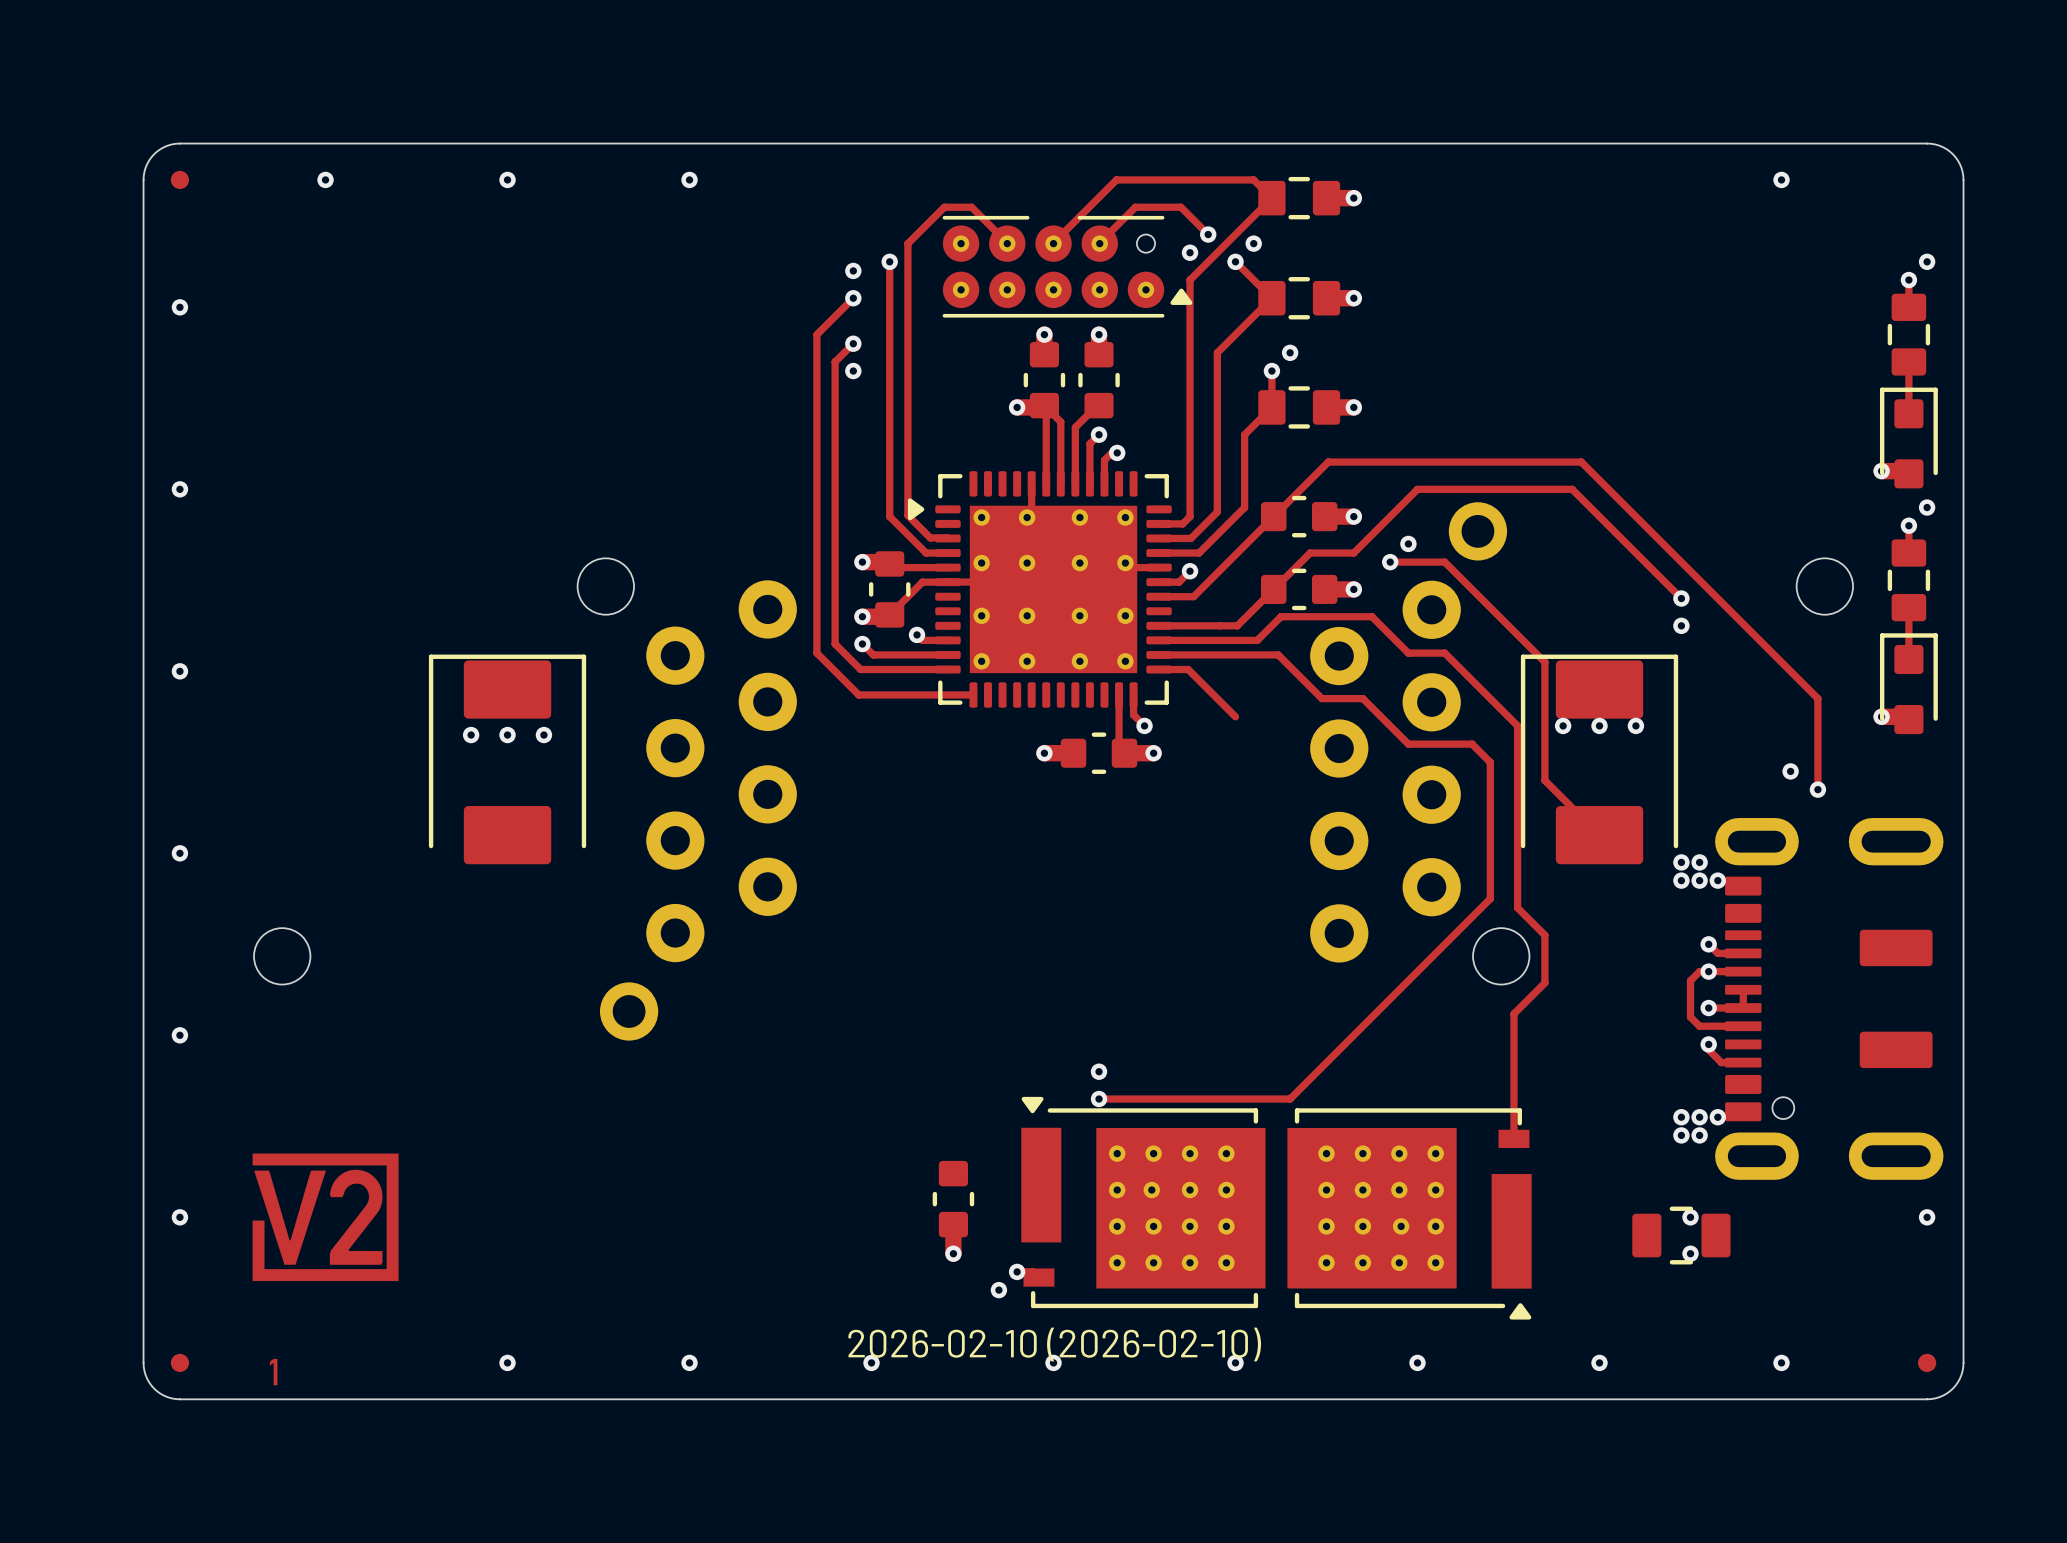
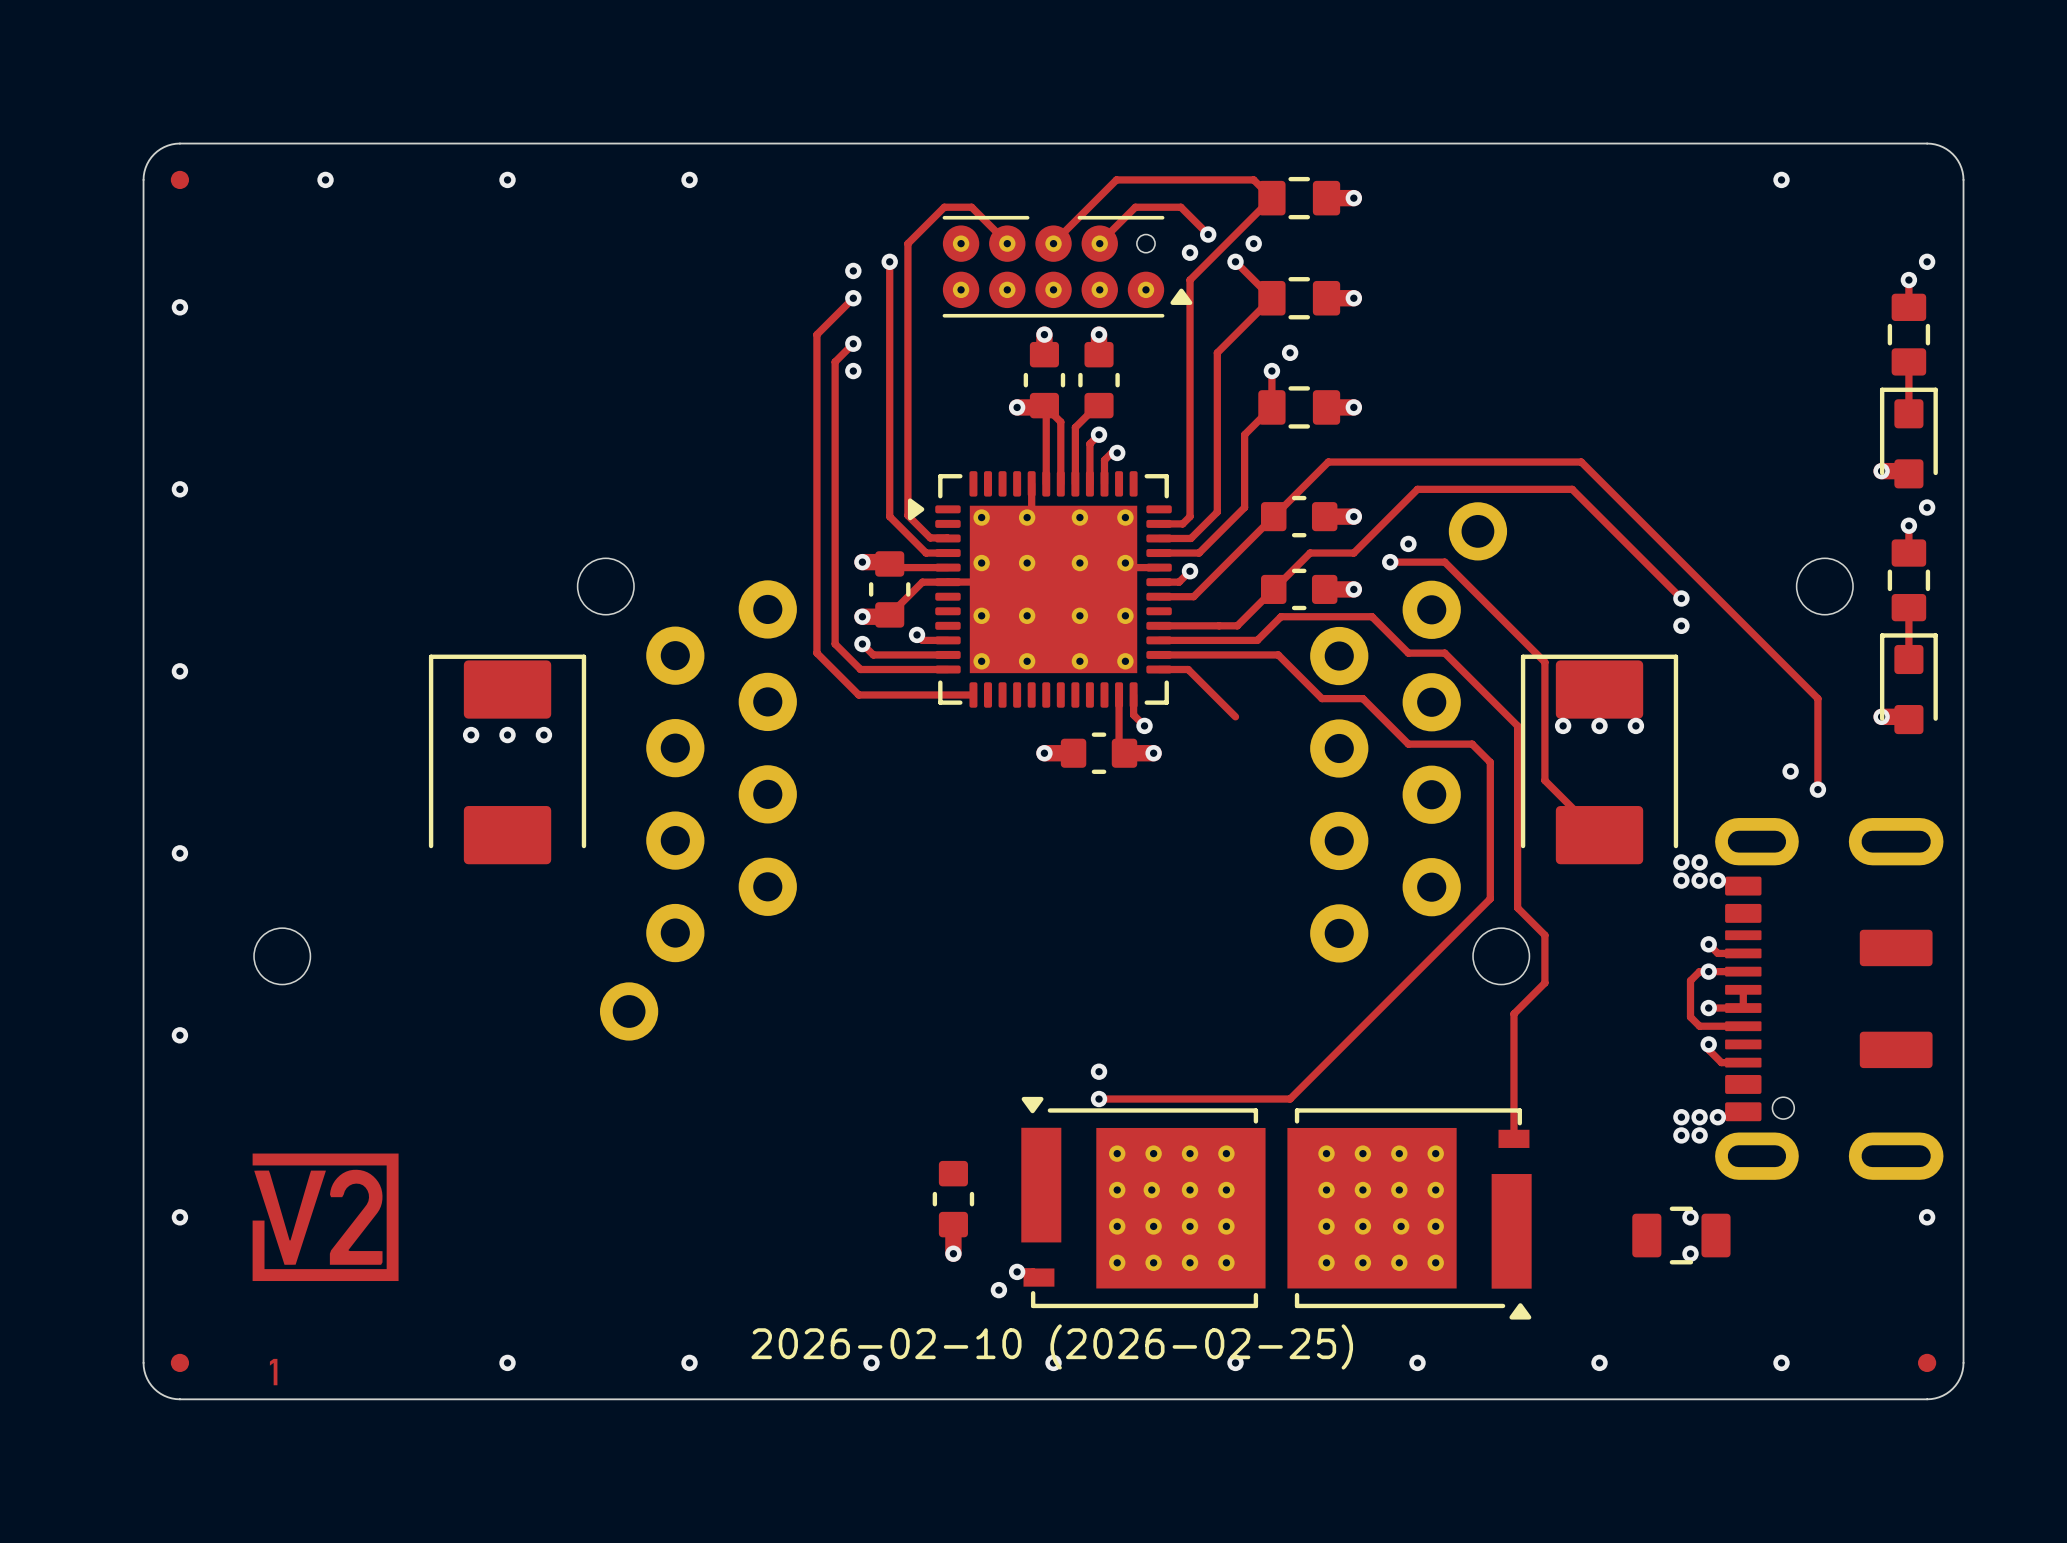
drawing shape: [848, 1327, 1262, 1362] -> [751, 1324, 1354, 1370]

